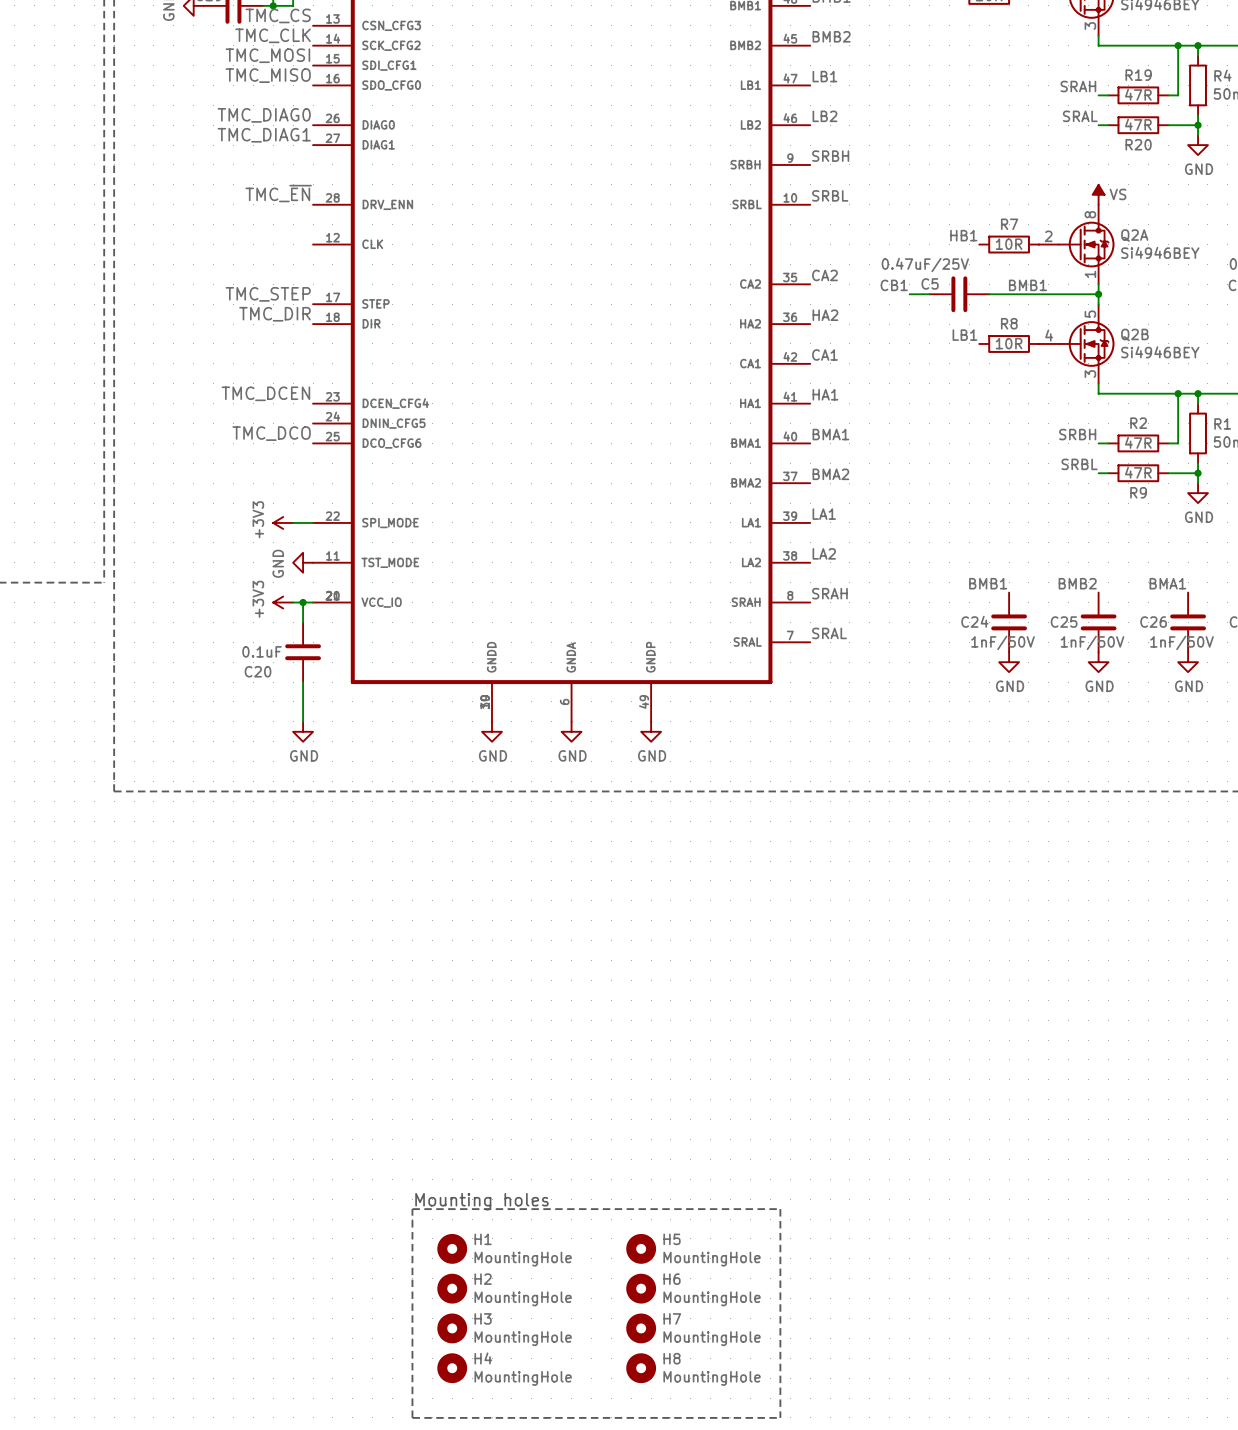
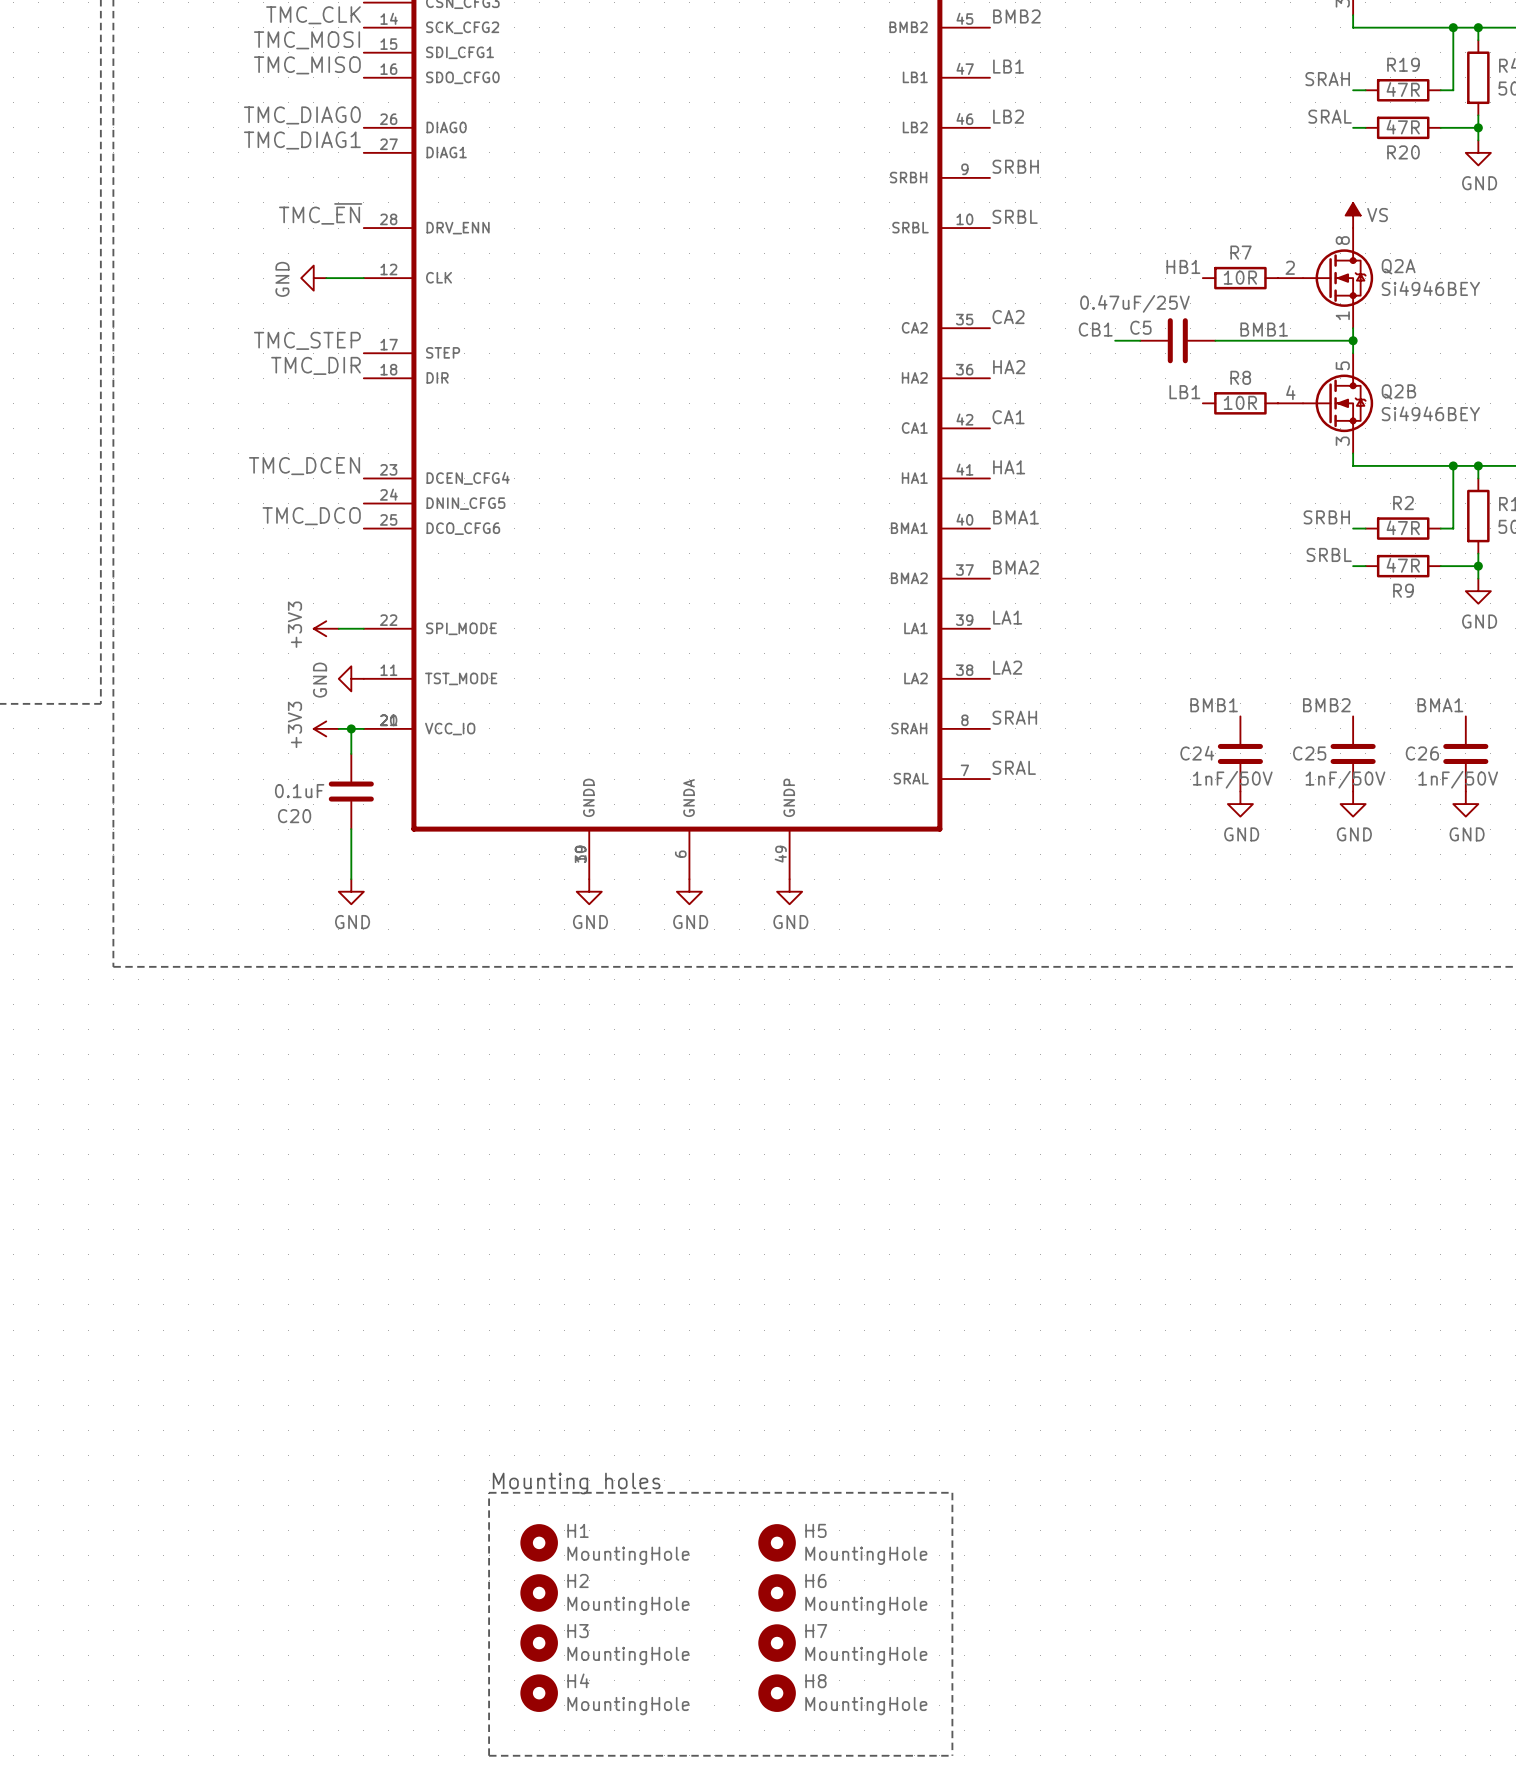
power symbol: none -> GND (313, 278)
wire: none -> (326, 278) (363, 278)

